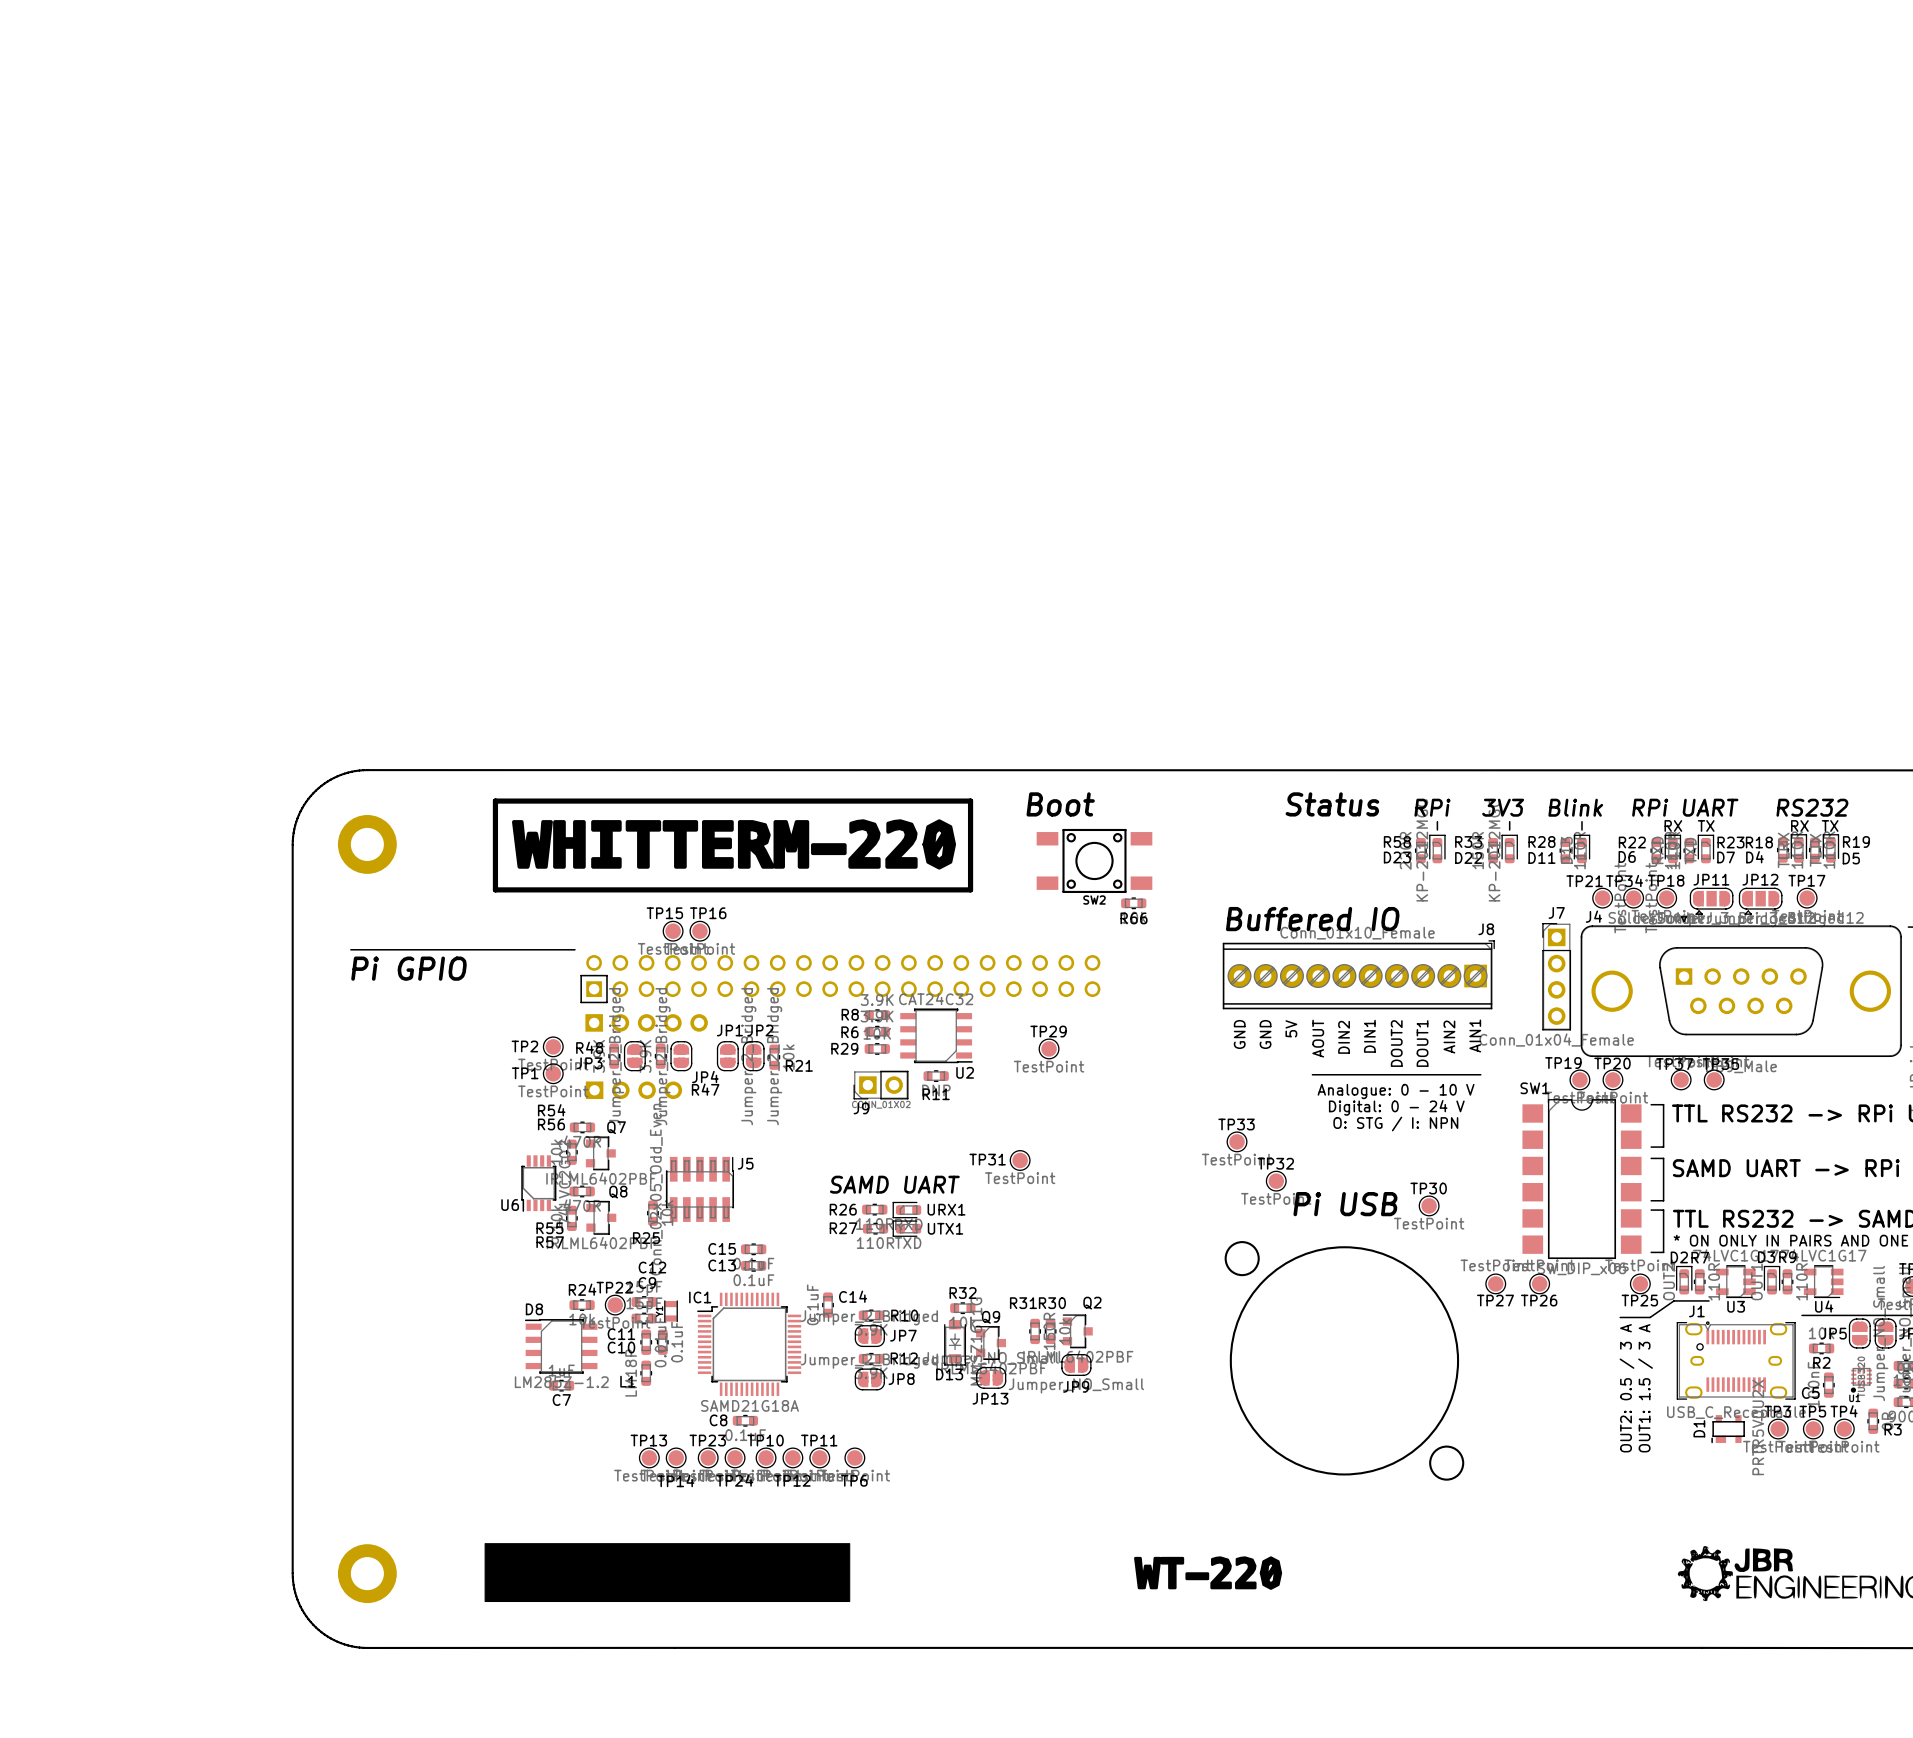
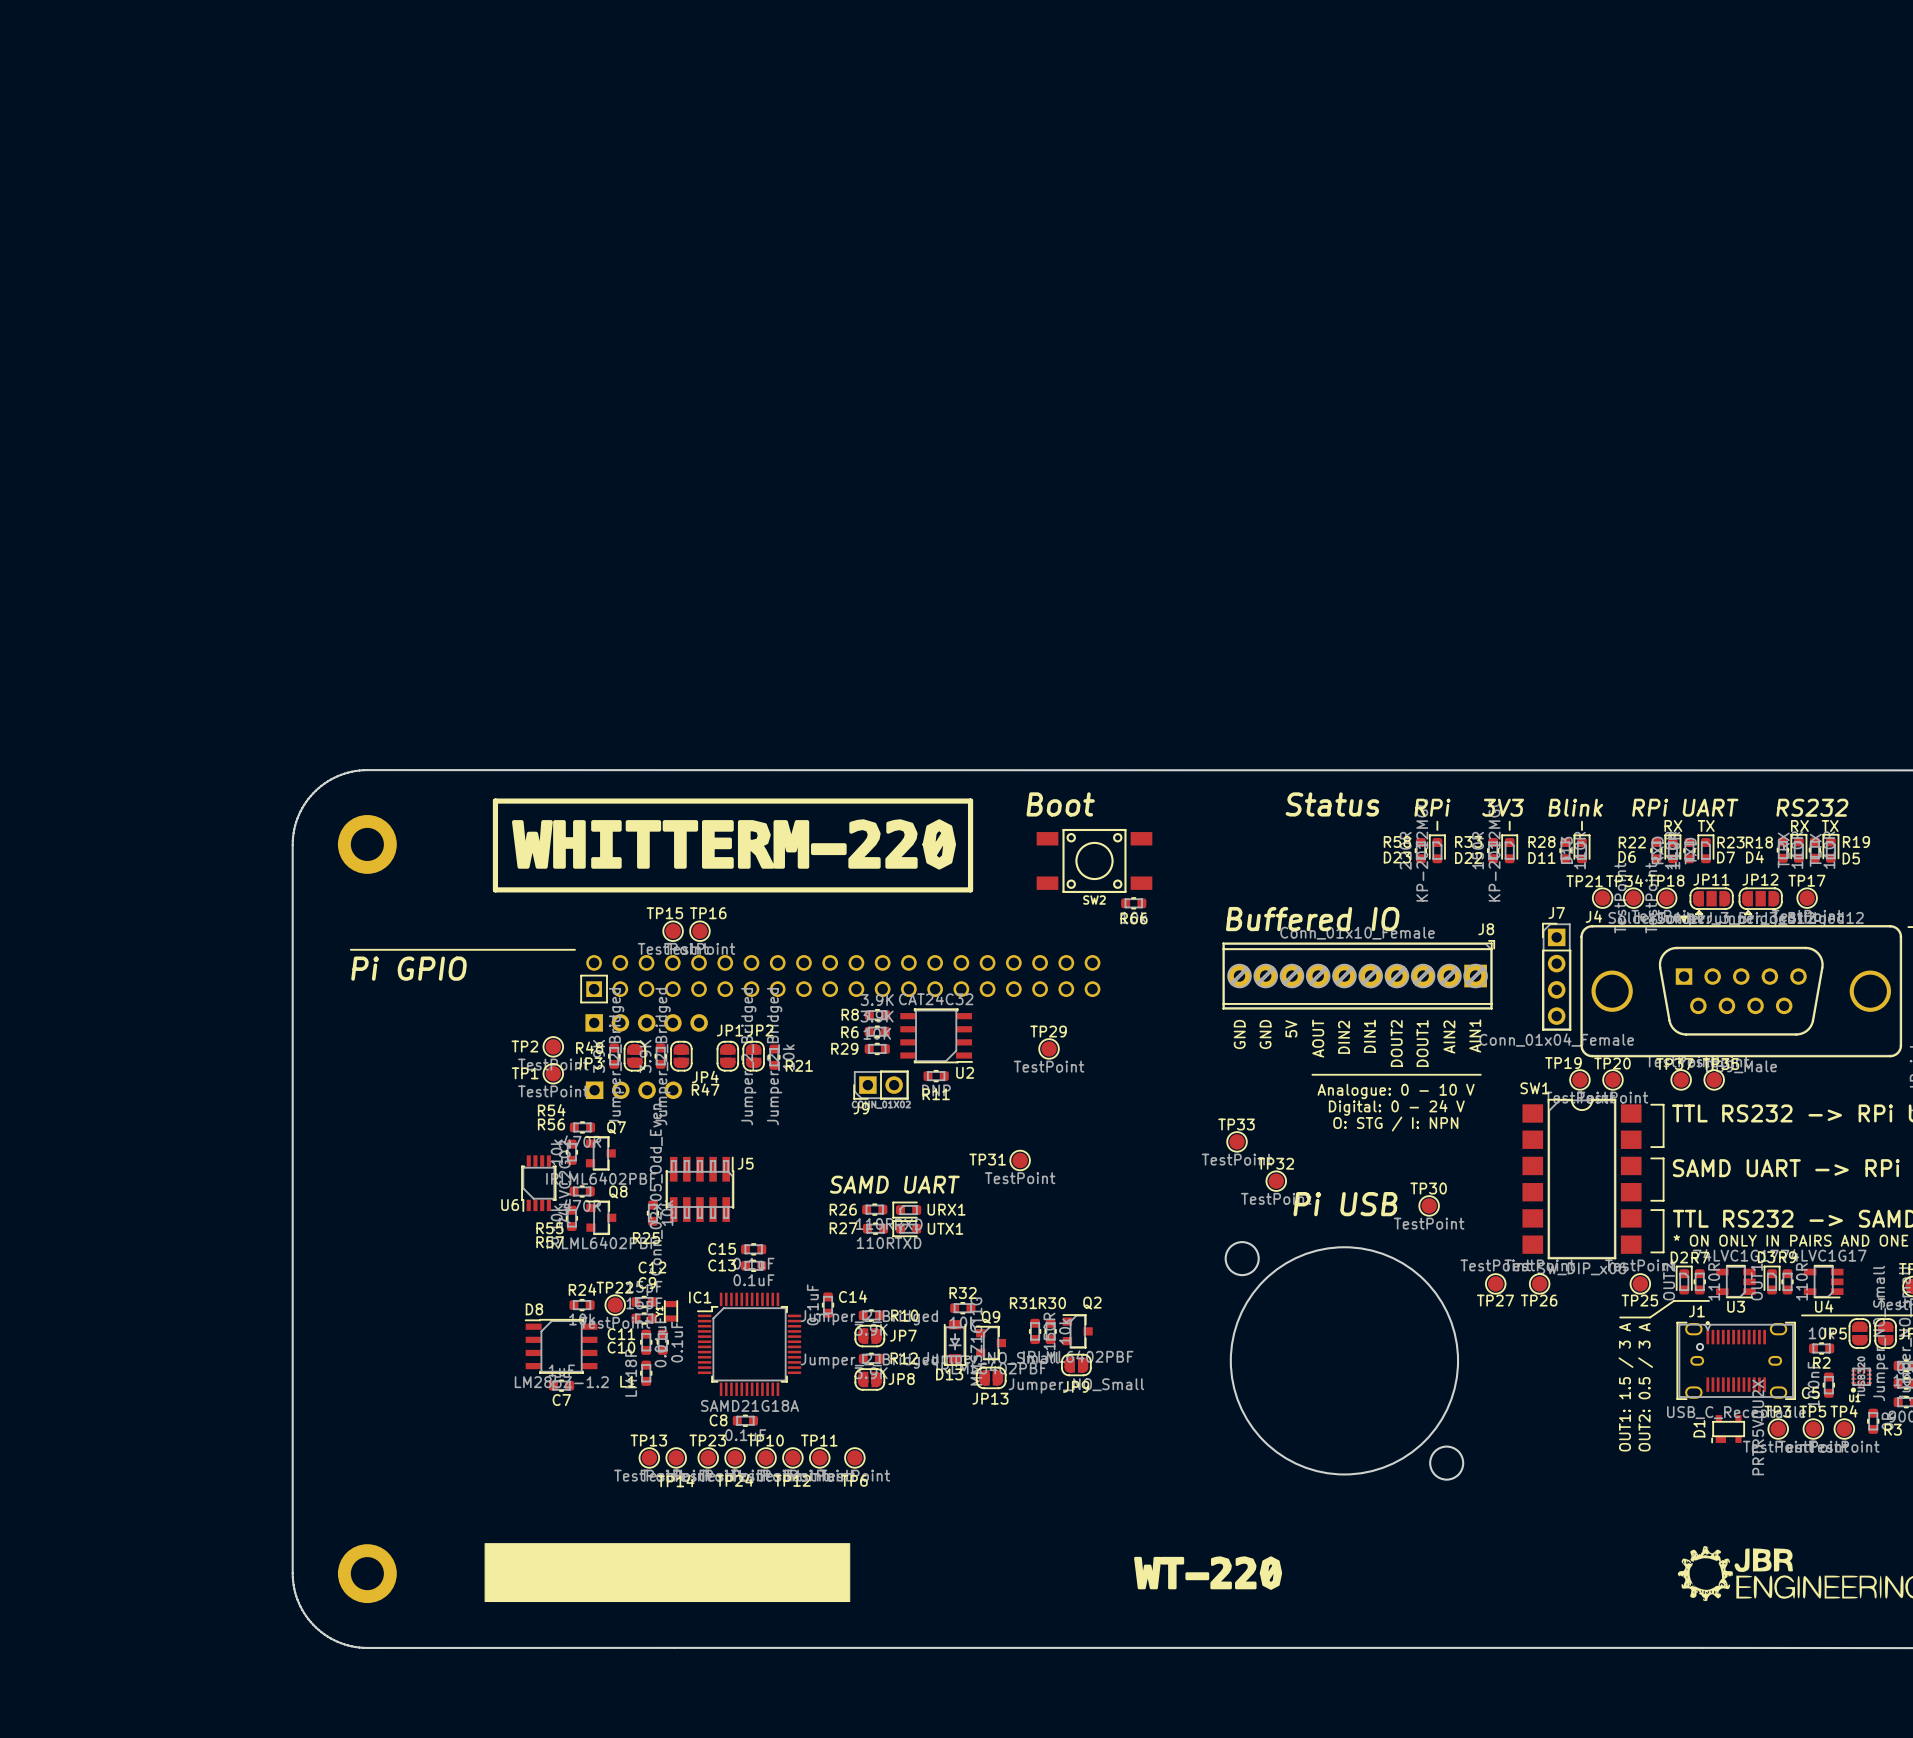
text: OUT2: 0.5 / 3 A (1627, 1388) -> OUT1: 1.5 / 3 A (1625, 1387)
text: OUT1: 1.5 / 3 A (1645, 1388) -> OUT2: 0.5 / 3 A (1645, 1387)

